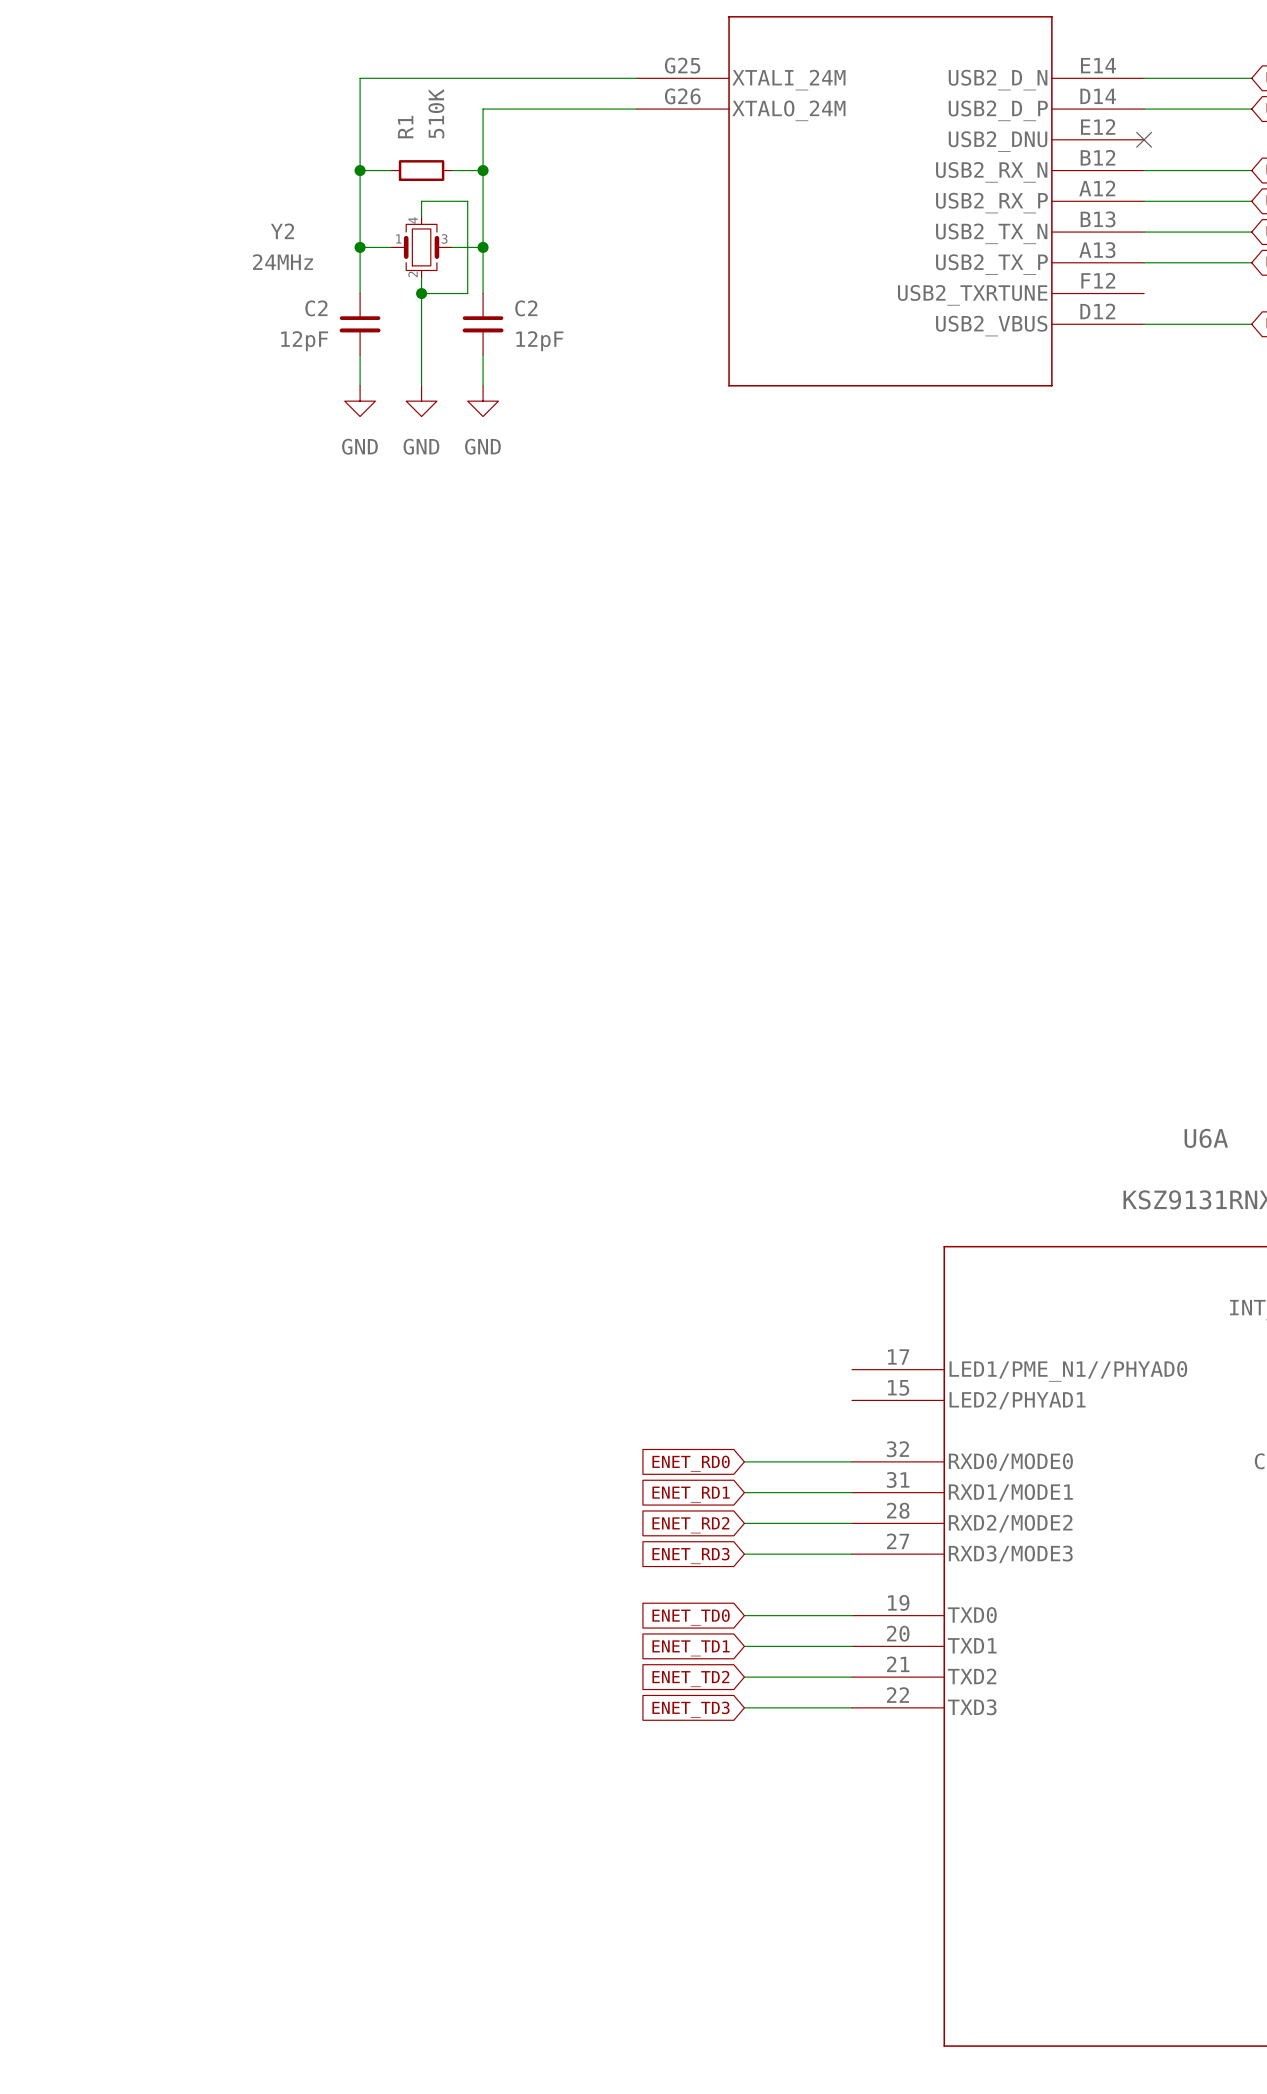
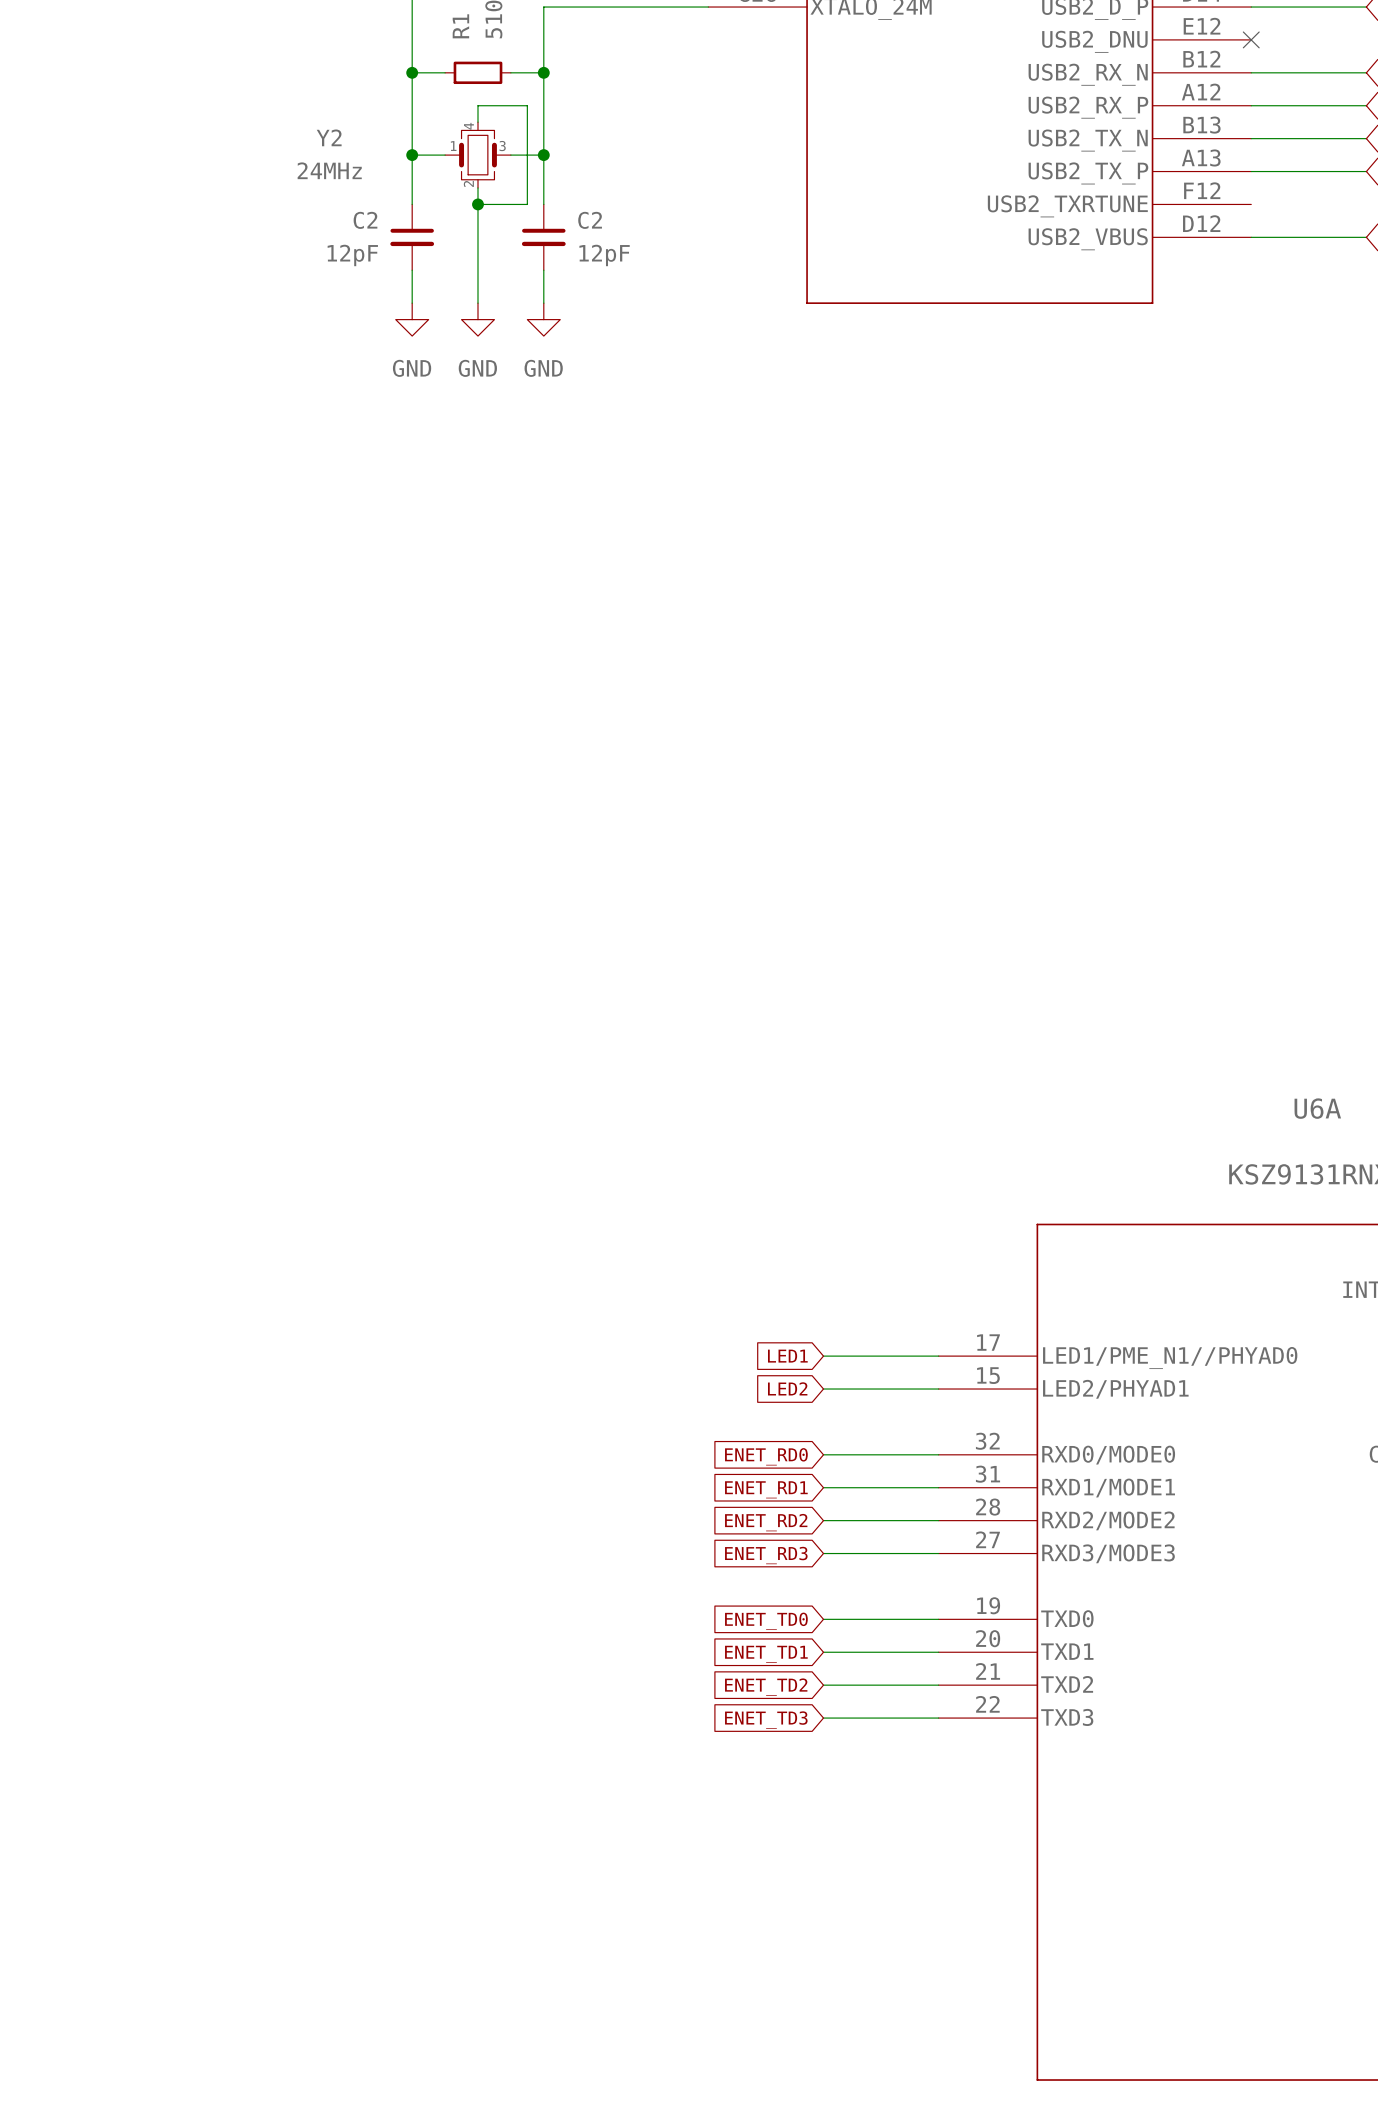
global label: none -> LED1 (787, 1356)
wire: none -> (823, 1356) (938, 1356)
global label: none -> LED2 (787, 1388)
wire: none -> (823, 1389) (938, 1389)

